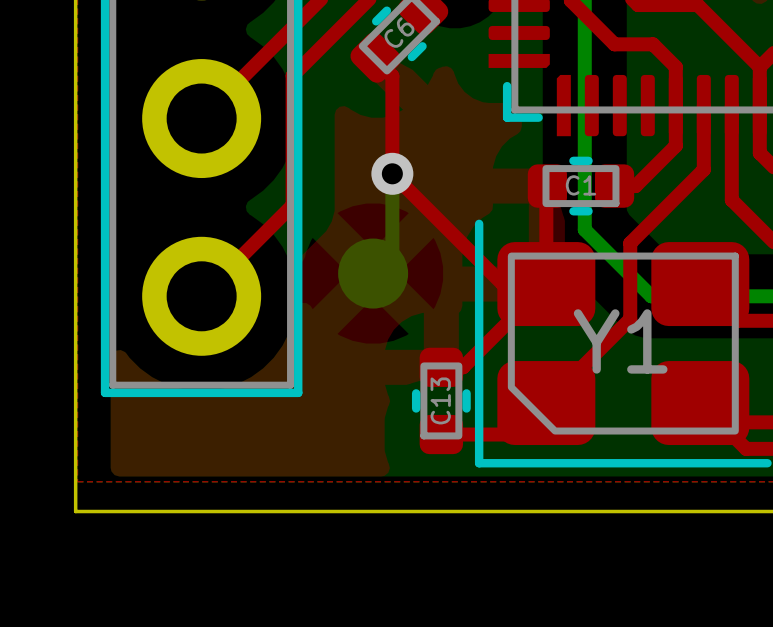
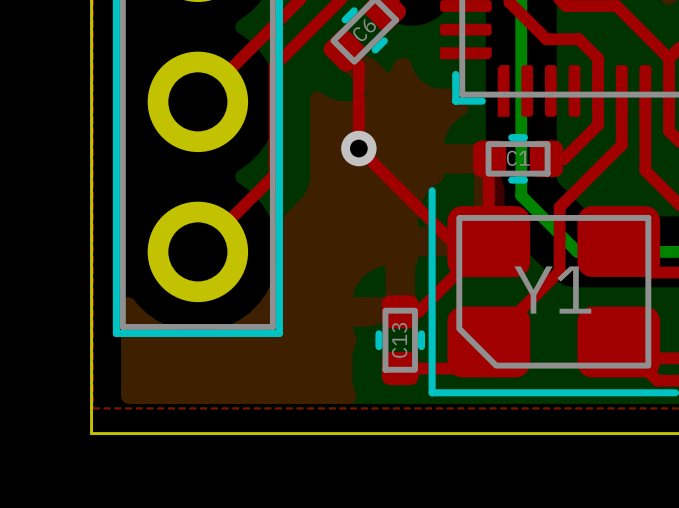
bottom track: (392, 173) (392, 254) (373, 273) -> none
part: (373, 273) -> none

